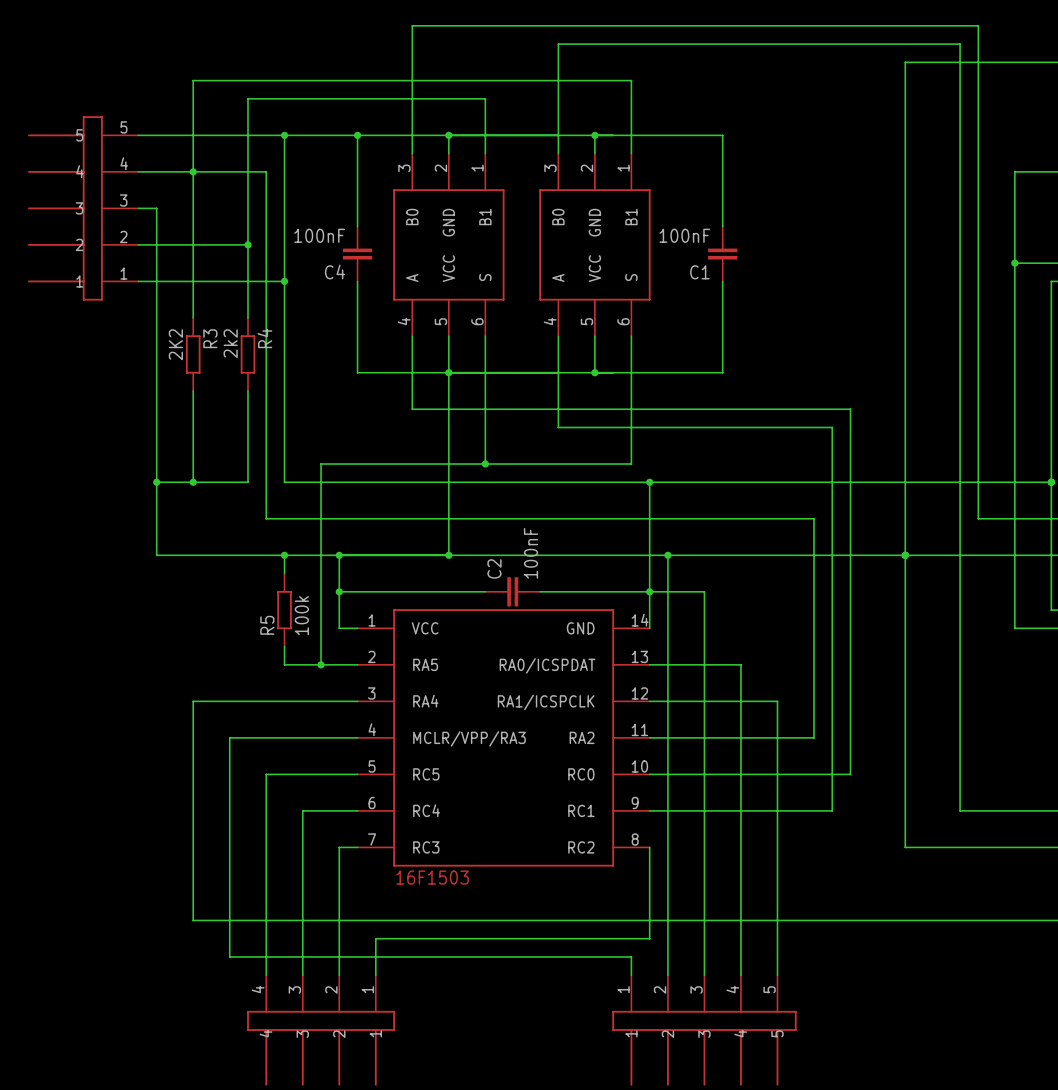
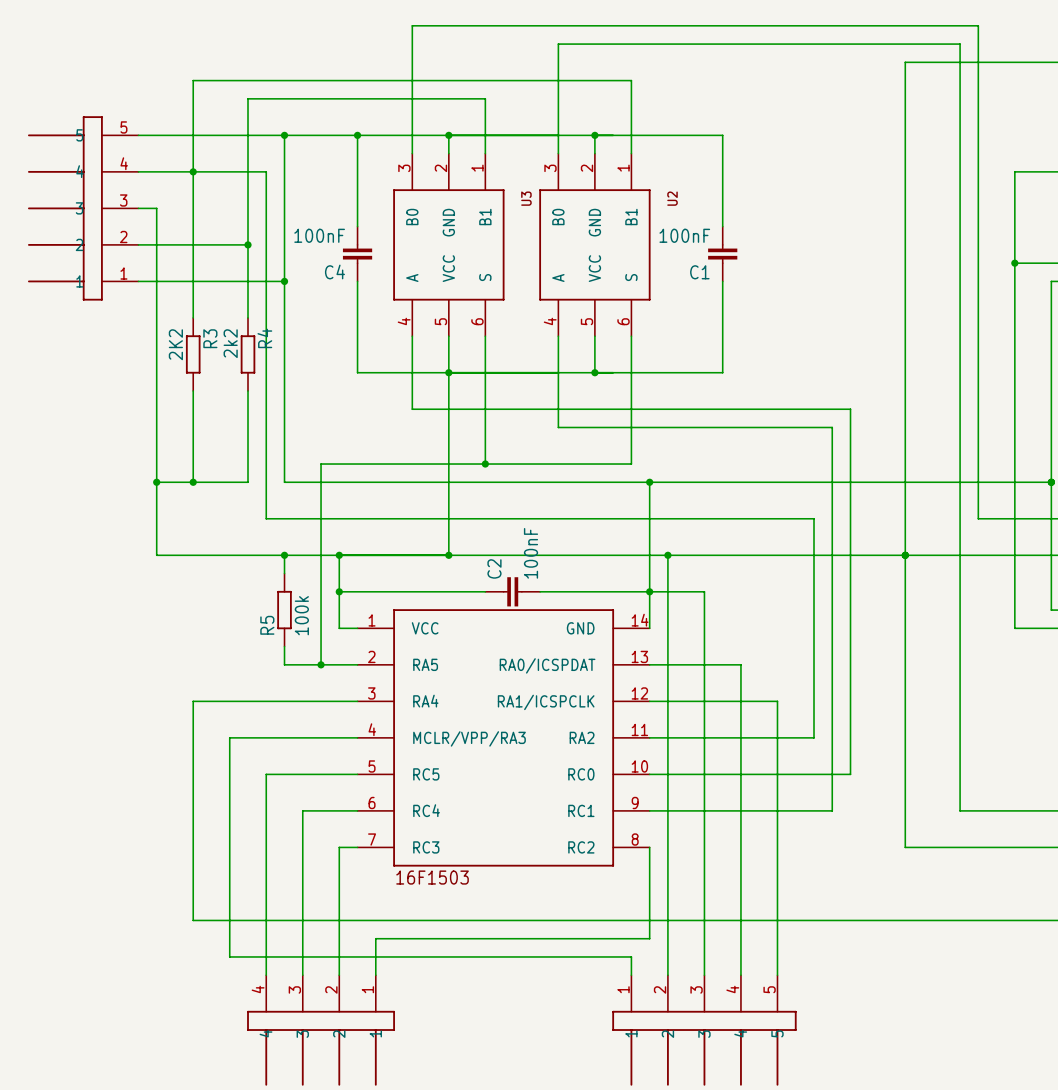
U3 name: none -> U3 (526, 198)
U2 name: none -> U2 (672, 198)

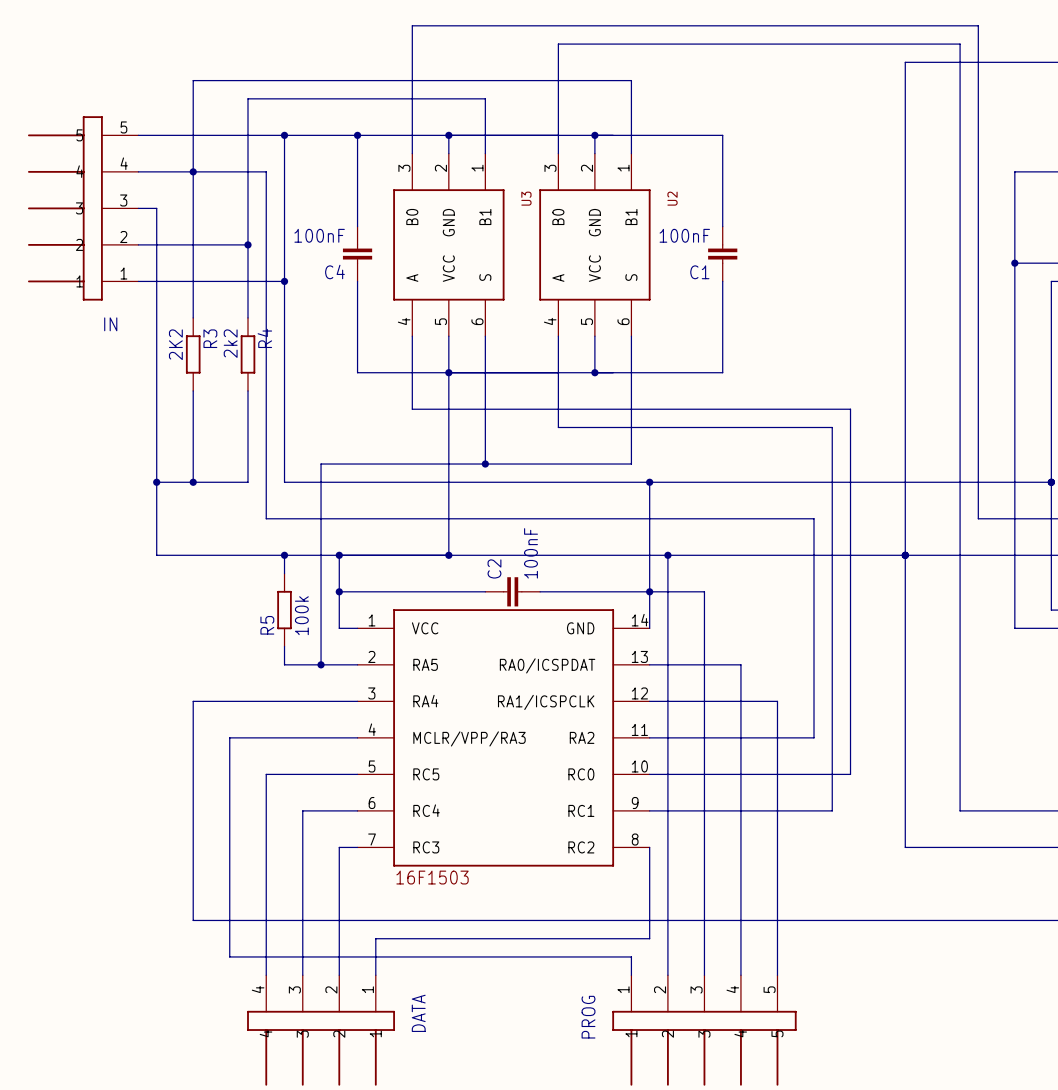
IN name: none -> IN (110, 324)
DATA name: none -> DATA (418, 1013)
PROG name: none -> PROG (588, 1017)

